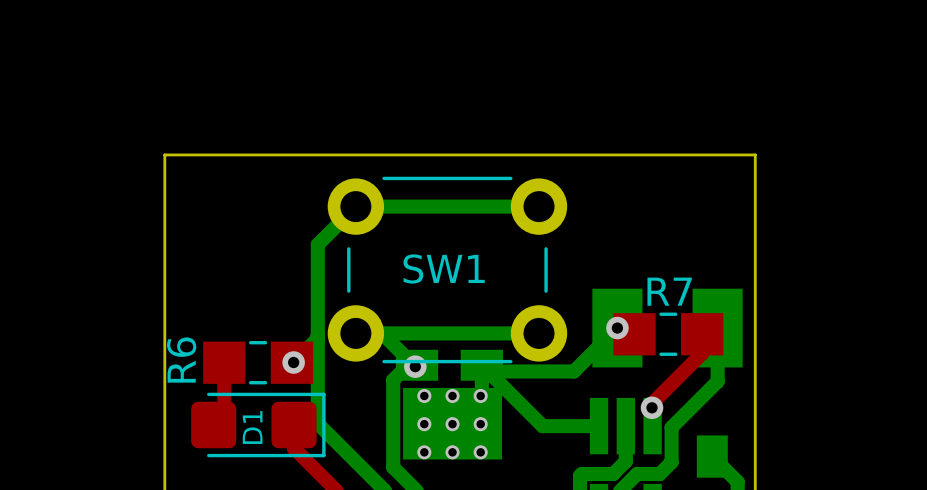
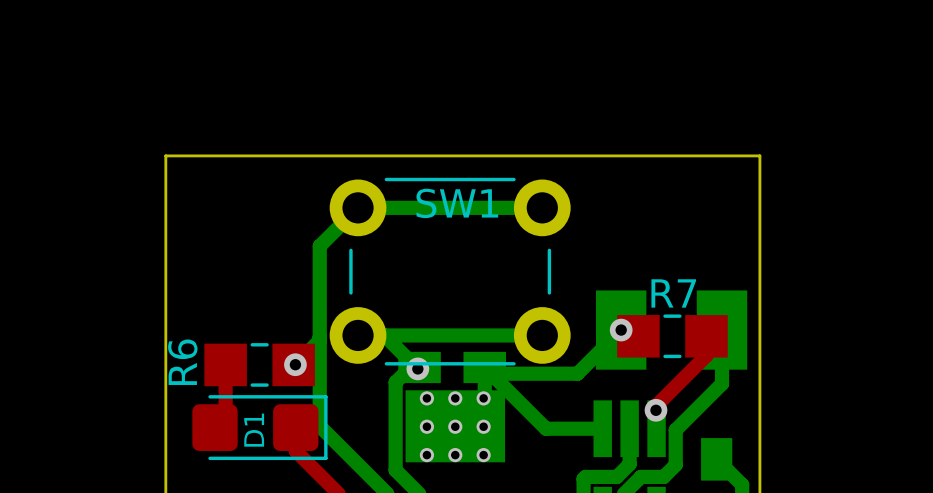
SW1 name position: SW1 (444, 268) -> SW1 (457, 203)

